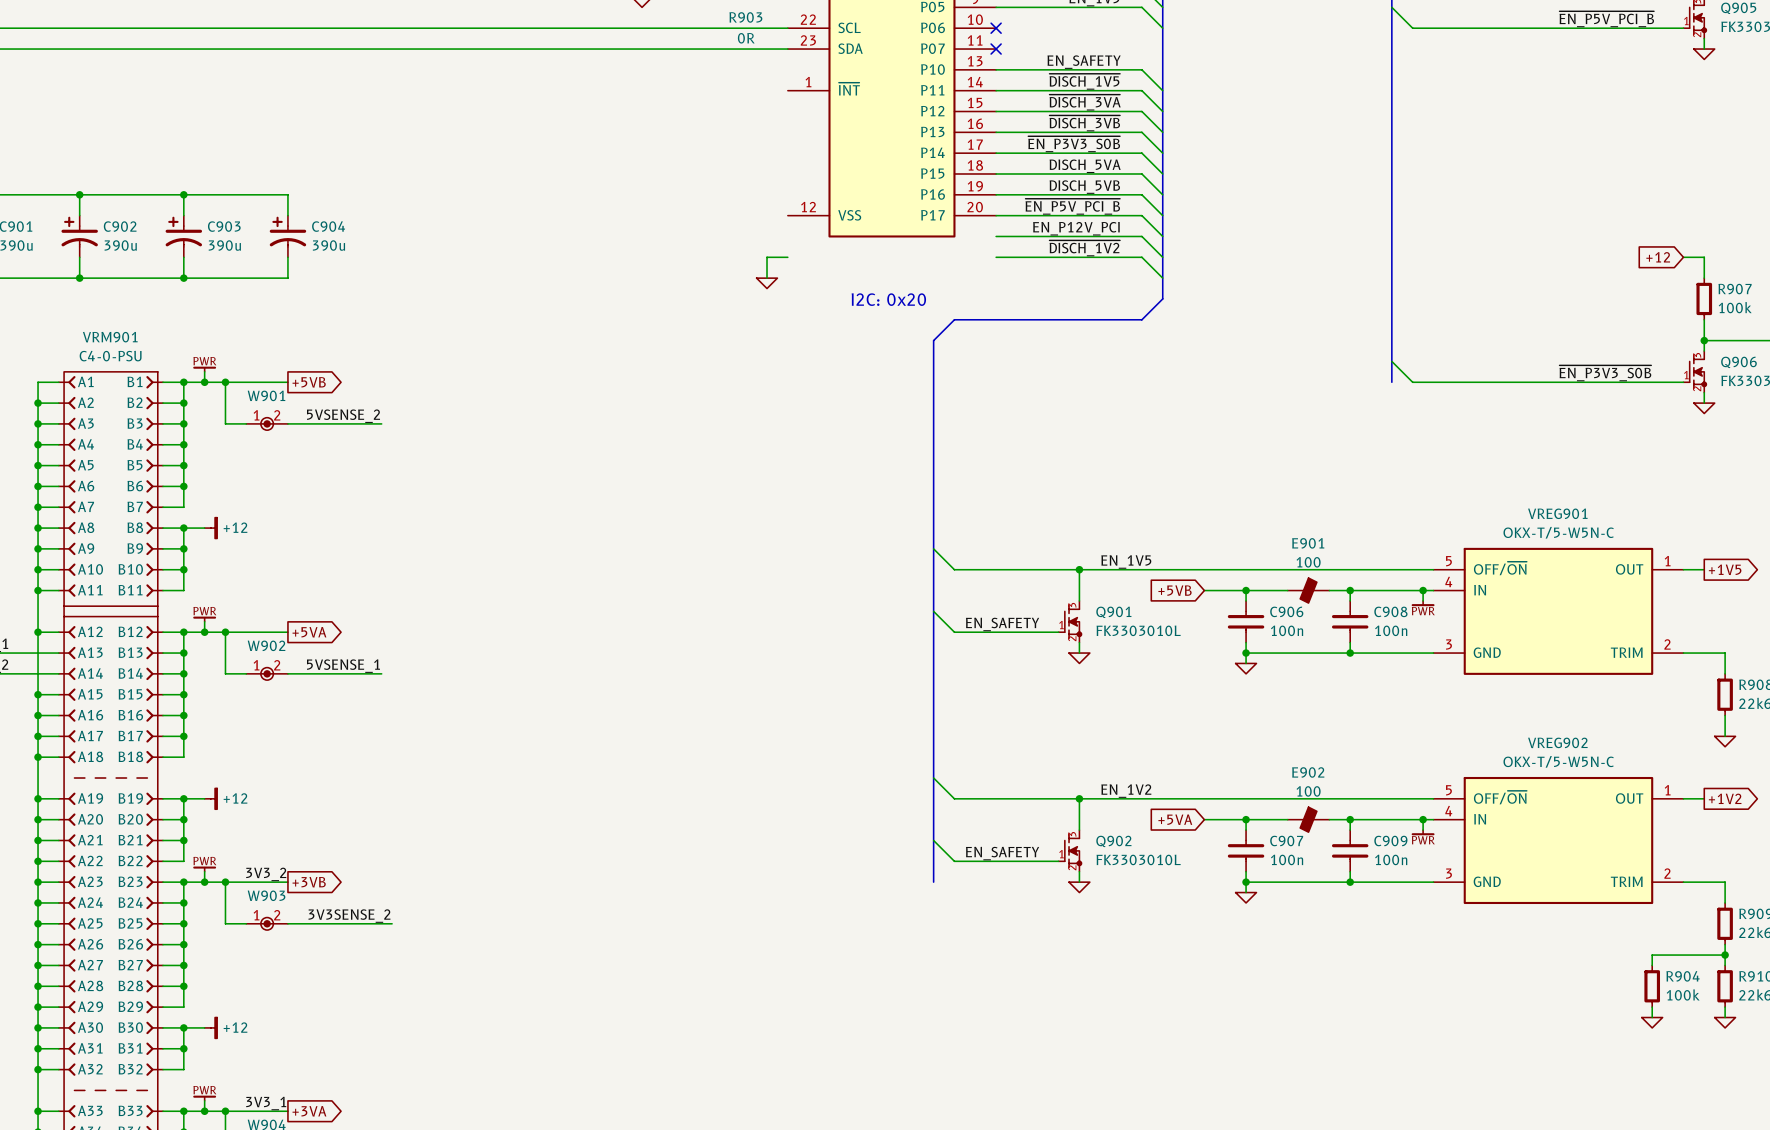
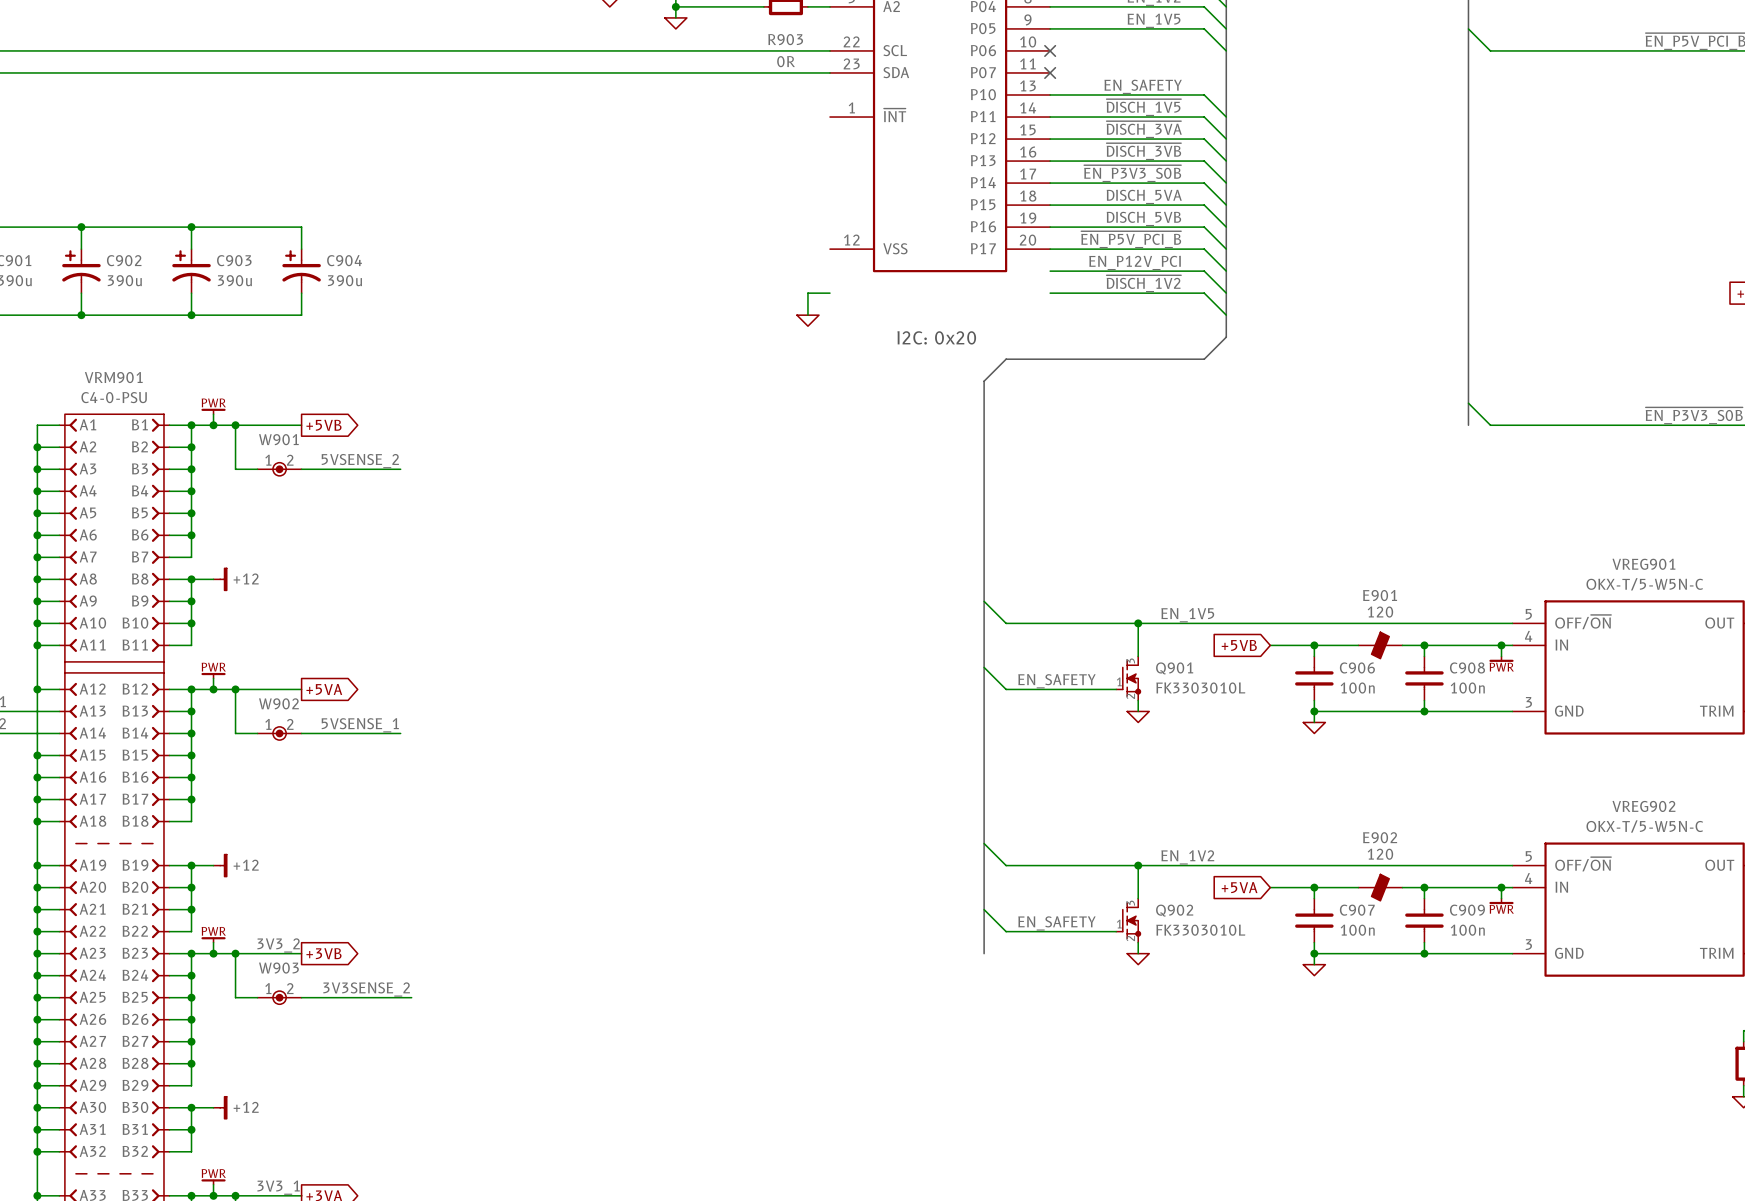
E901 value: 100 (1308, 562) -> 120 (1380, 612)
E902 value: 100 (1308, 791) -> 120 (1380, 854)

